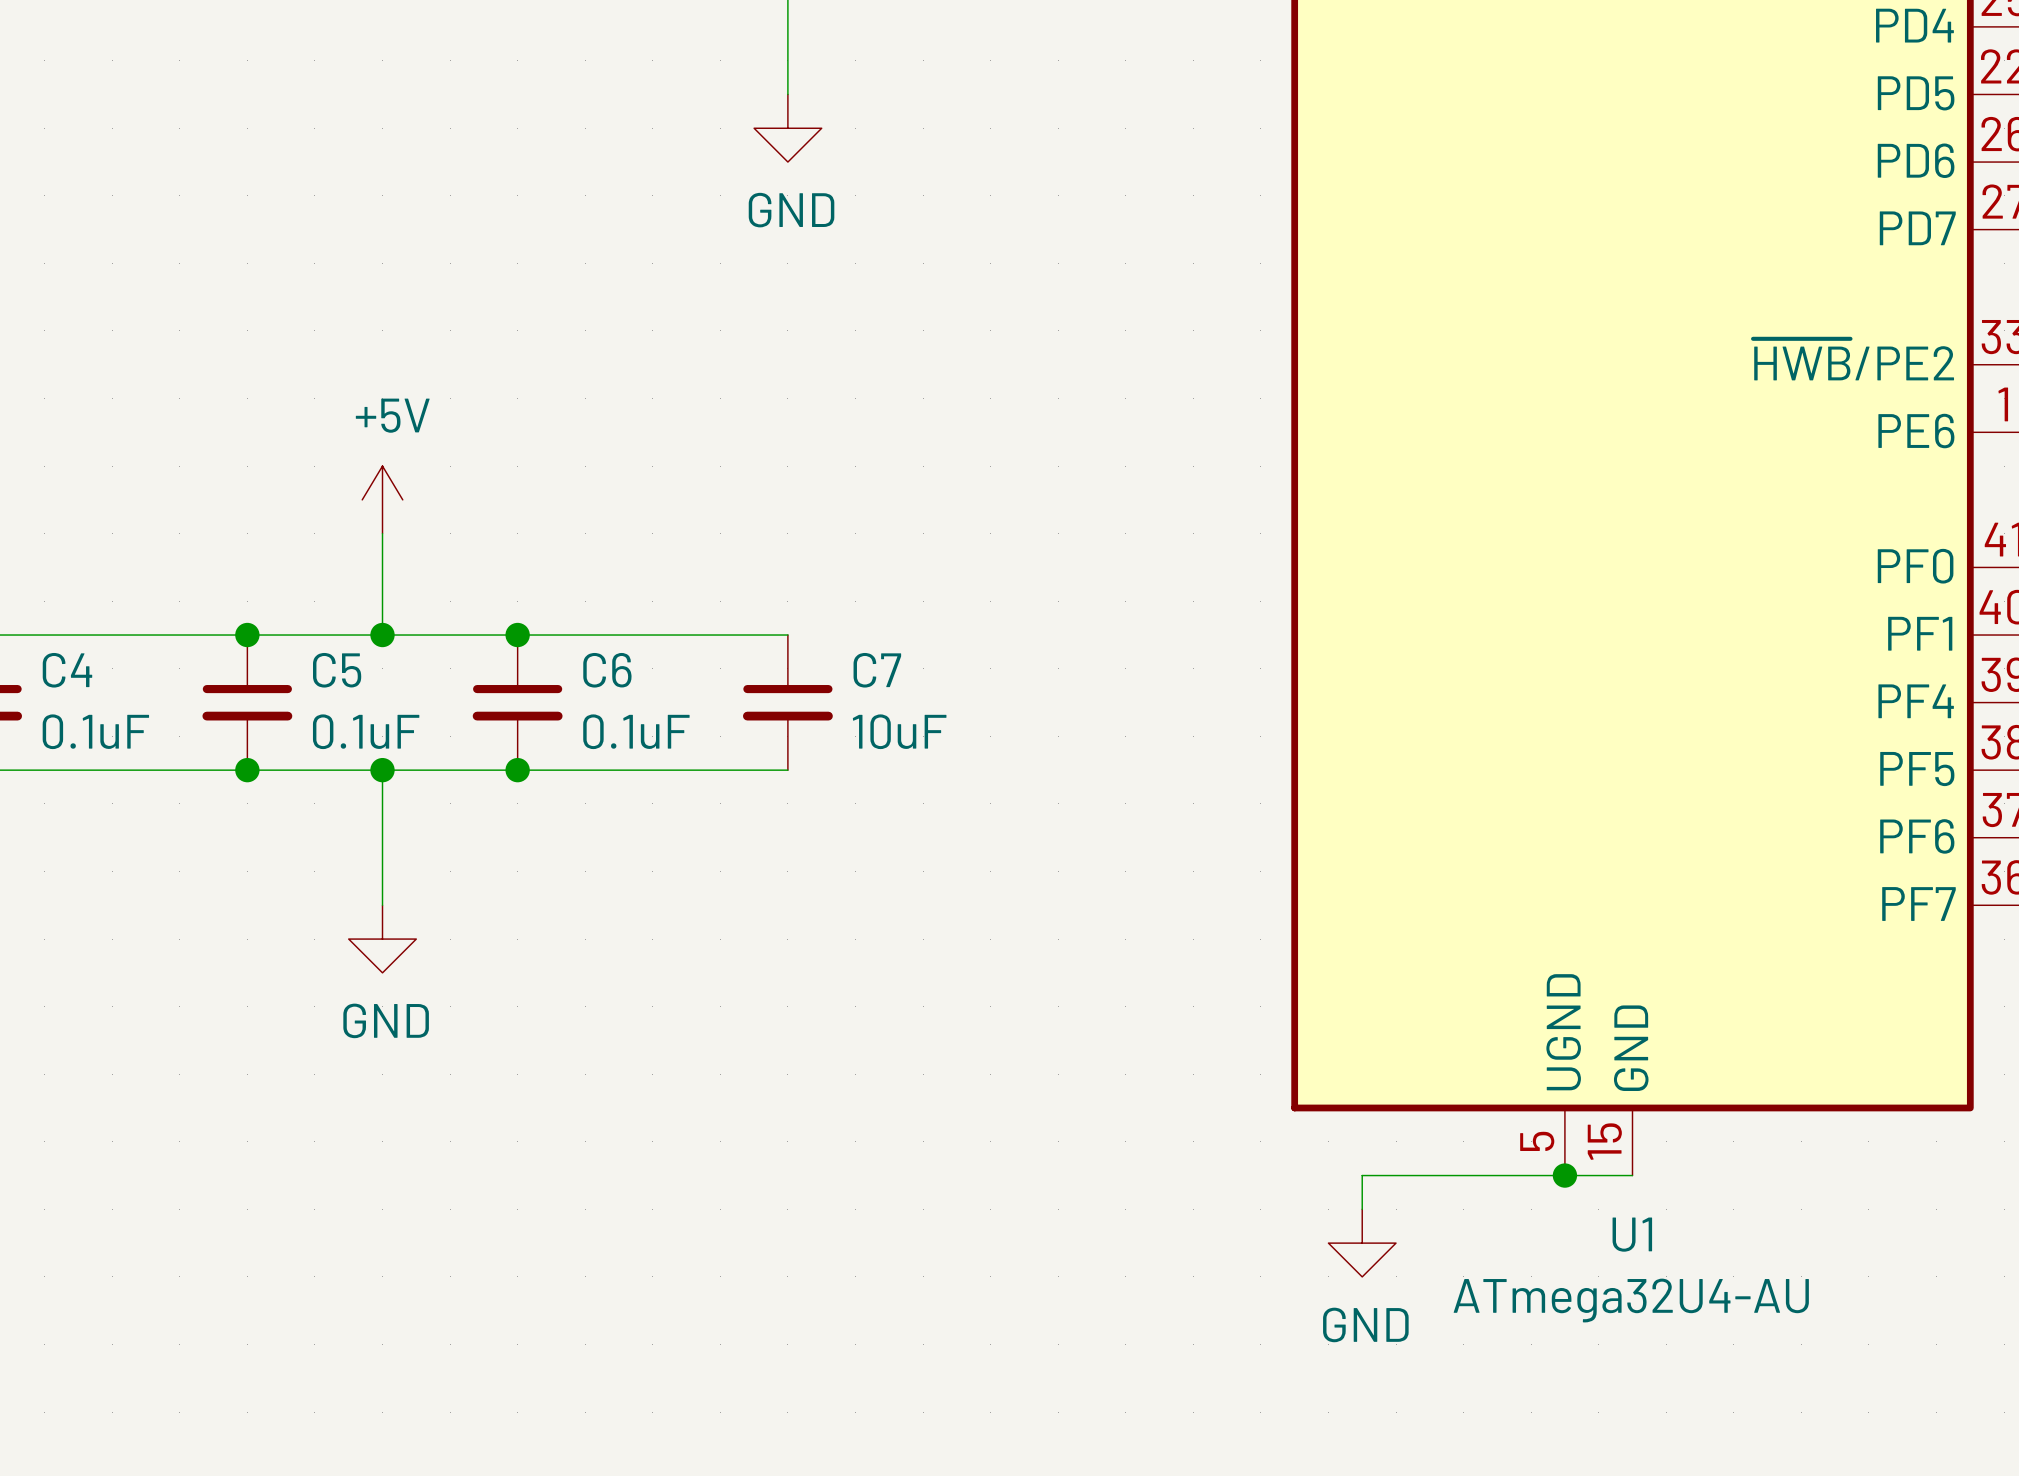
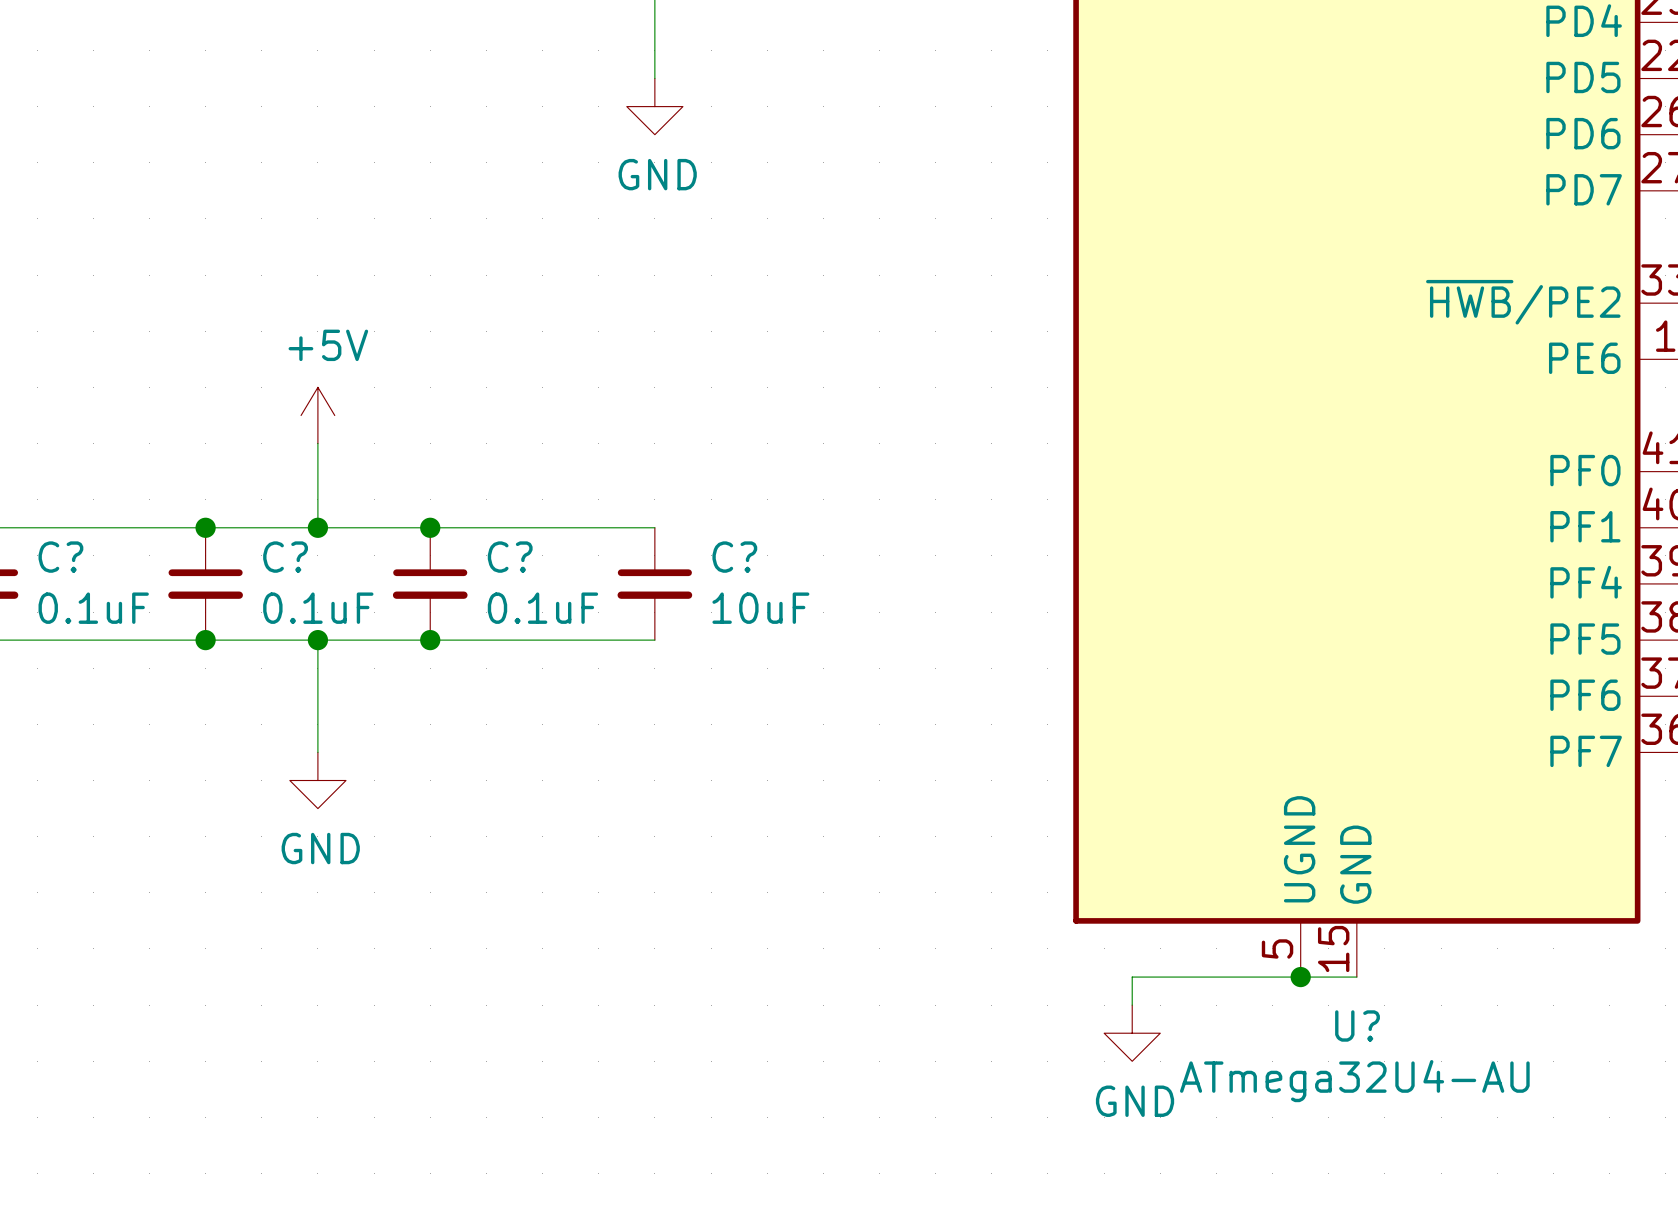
C4 name: C4 (67, 670) -> C? (60, 557)
C5 name: C5 (337, 670) -> C? (285, 557)
C6 name: C6 (607, 670) -> C? (510, 557)
C7 name: C7 (877, 670) -> C? (734, 557)
U1 name: U1 (1632, 1234) -> U? (1357, 1025)

